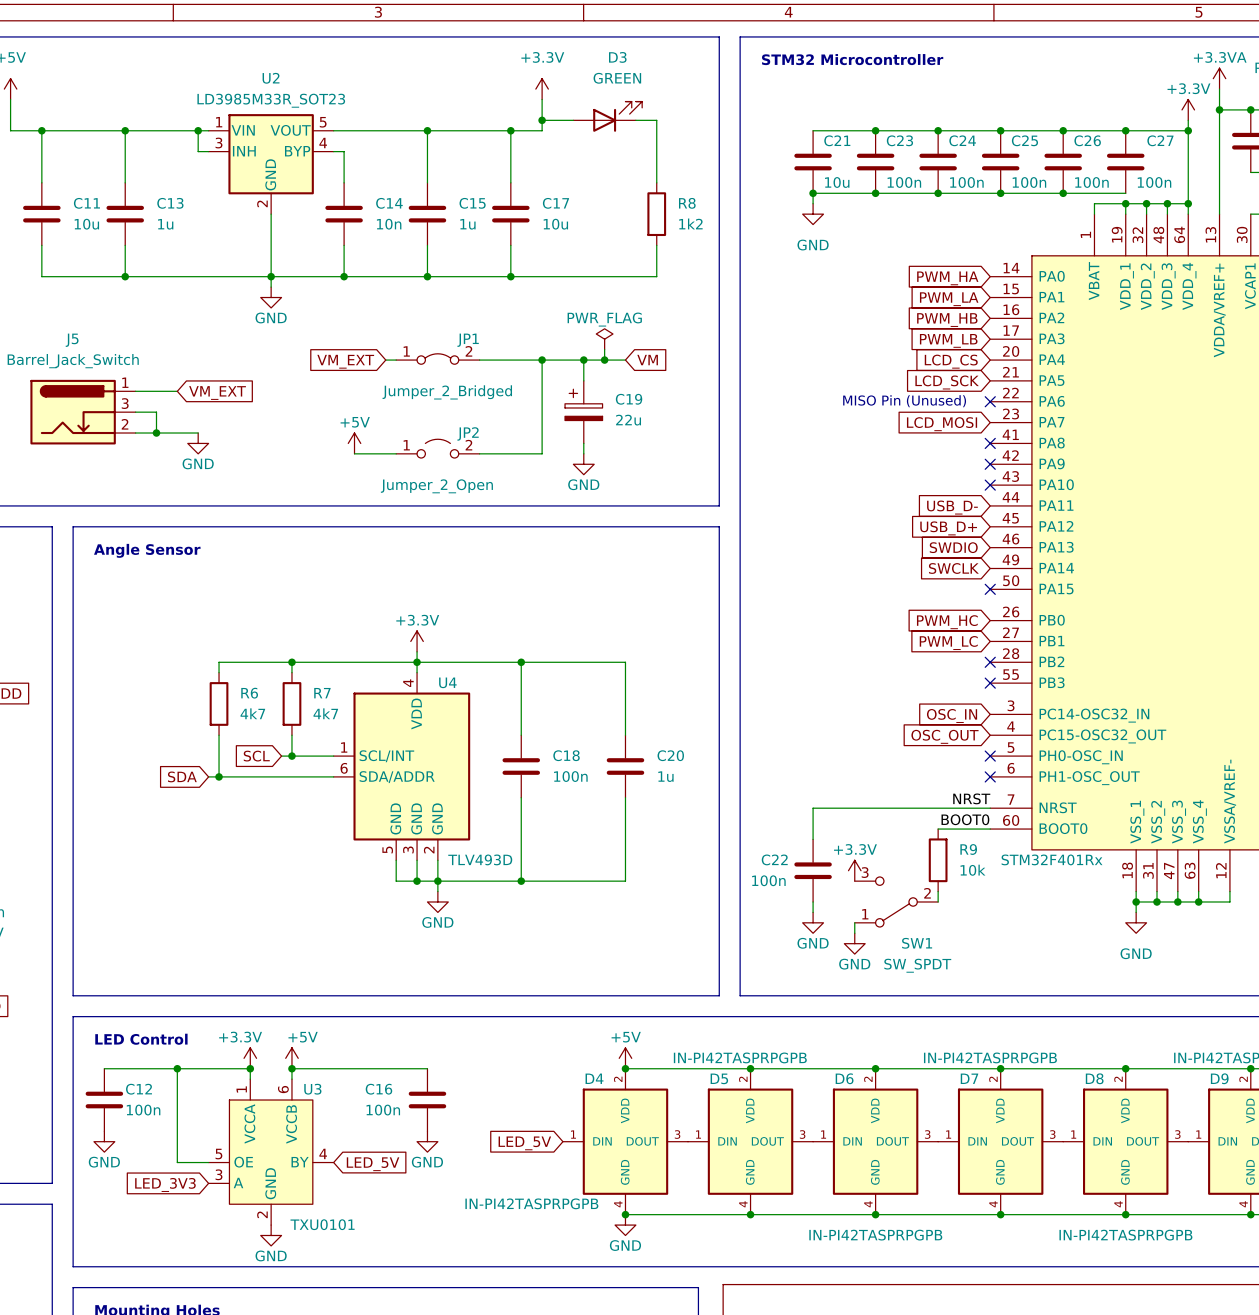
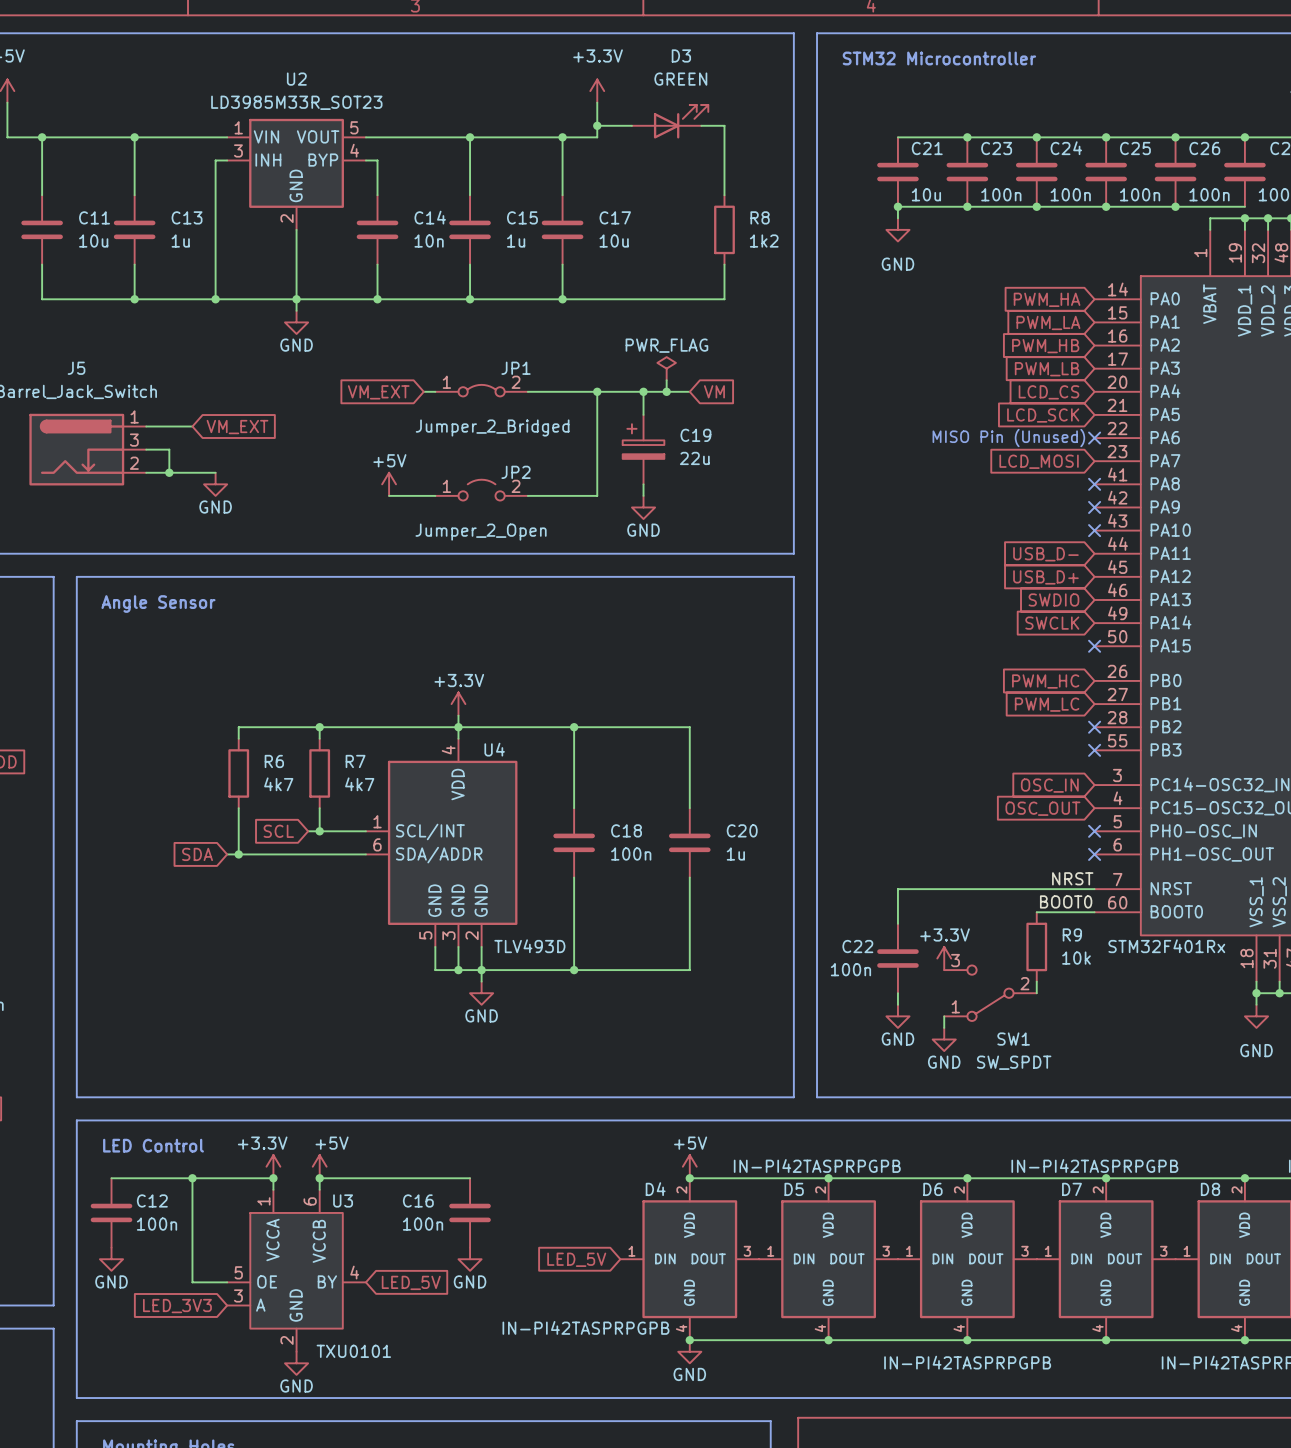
wire: (198, 130) (198, 151) -> (215, 299) (215, 160)
junction: (198, 130) -> none
junction: none -> (215, 299)

